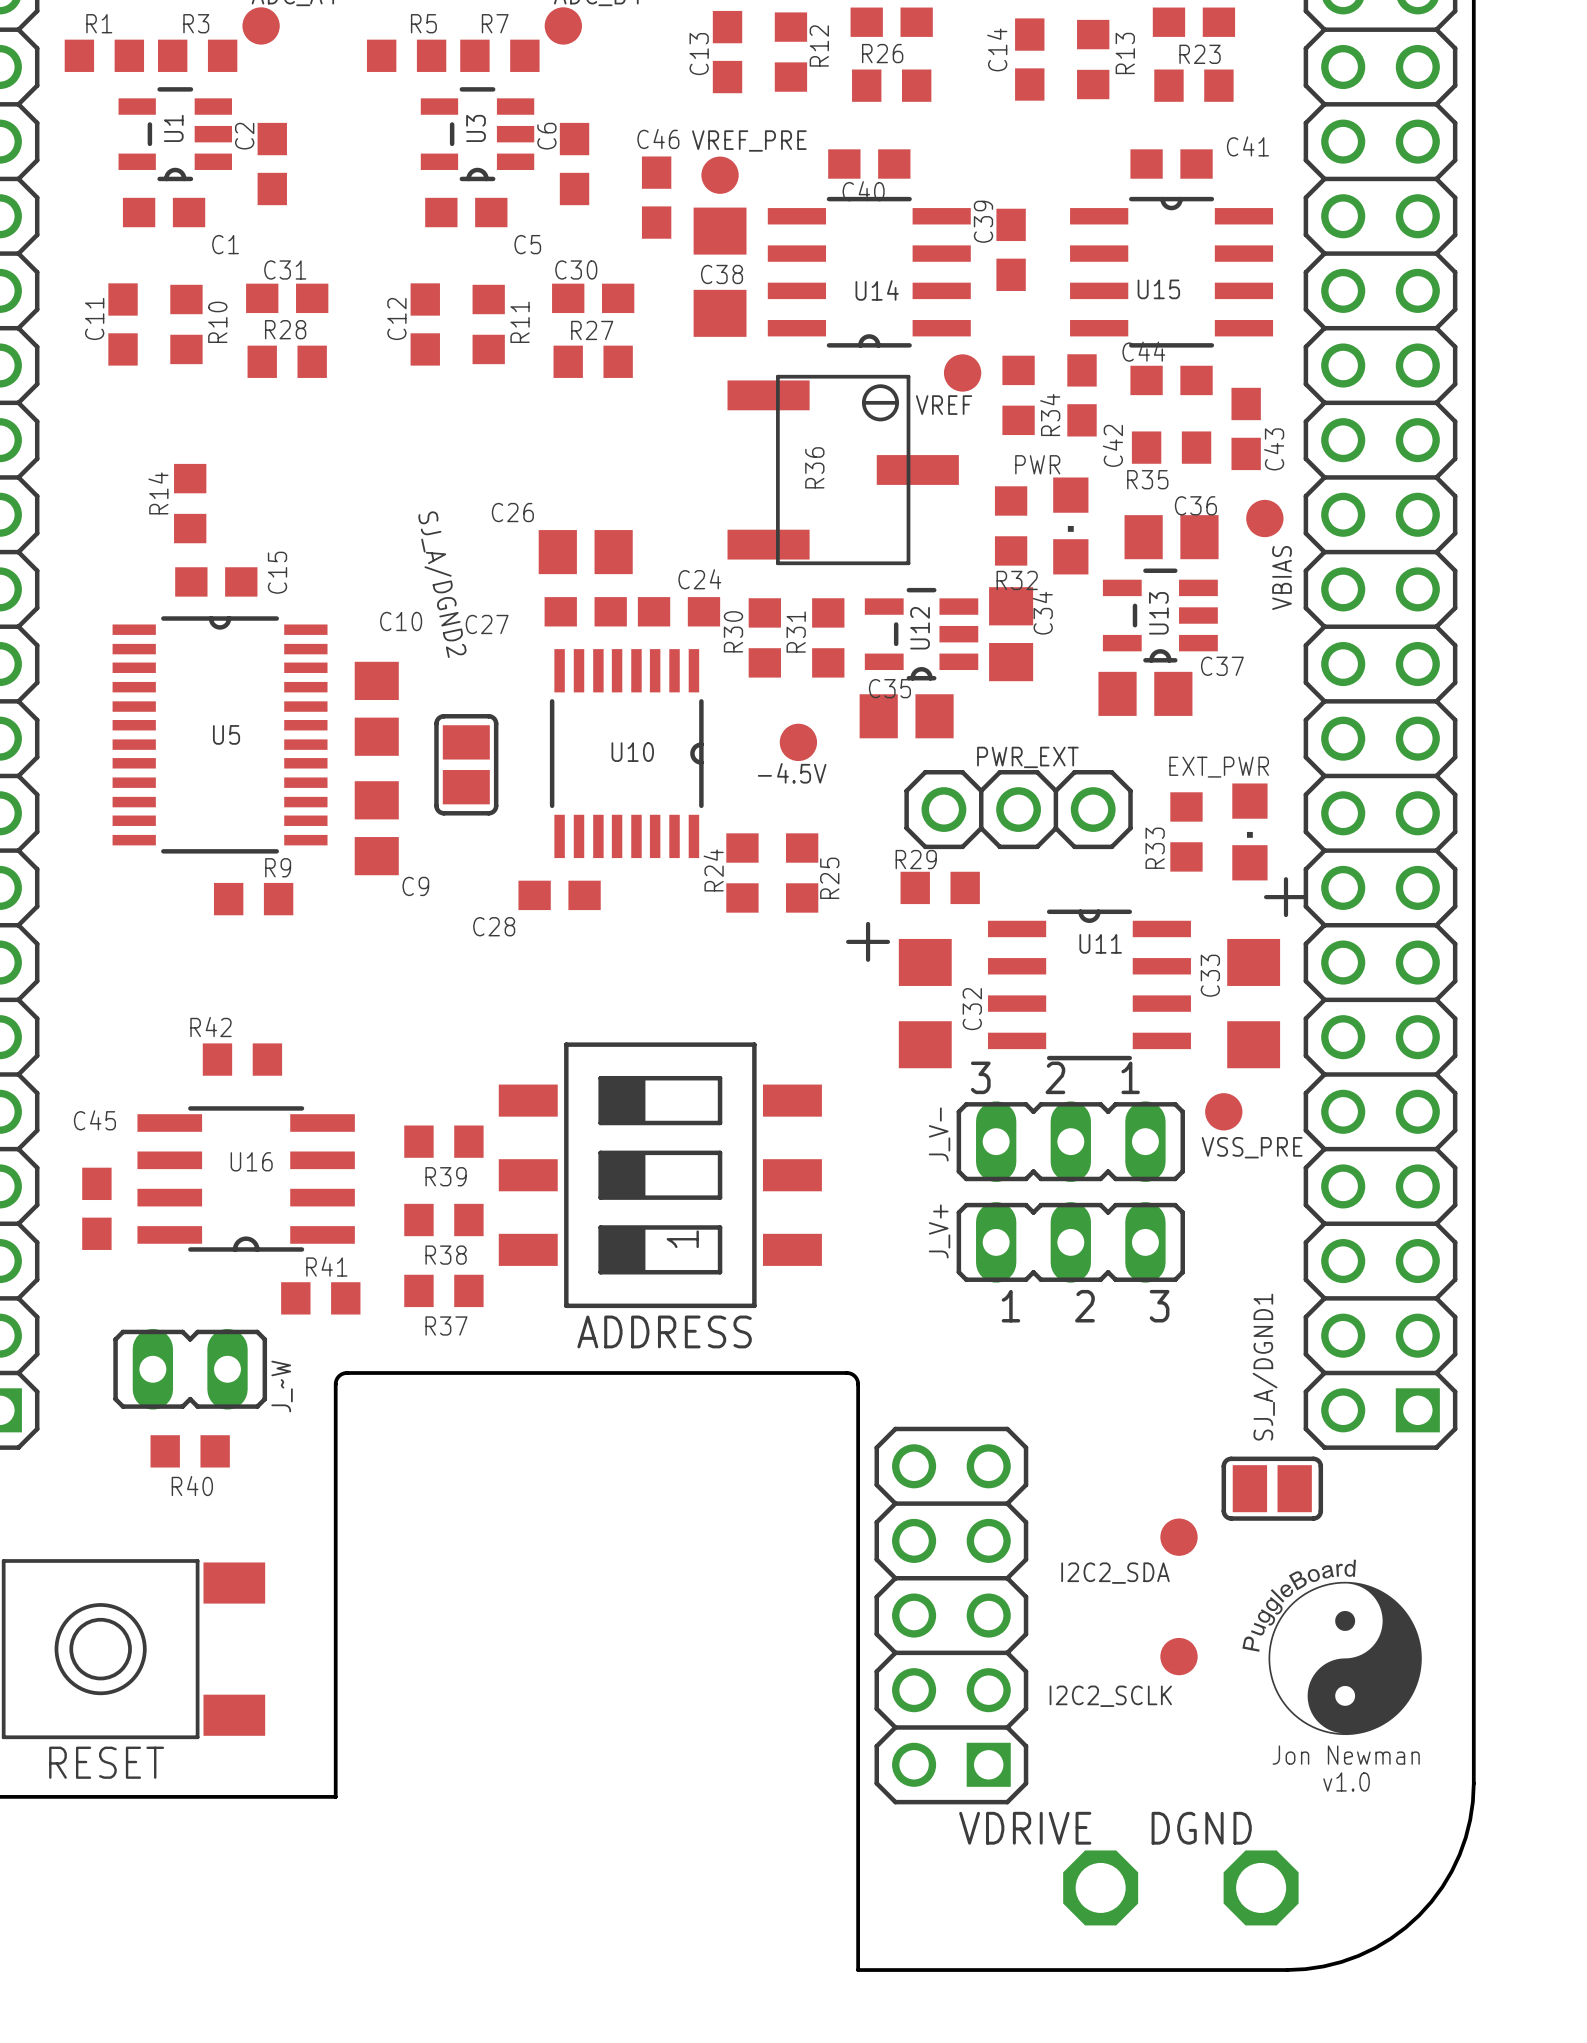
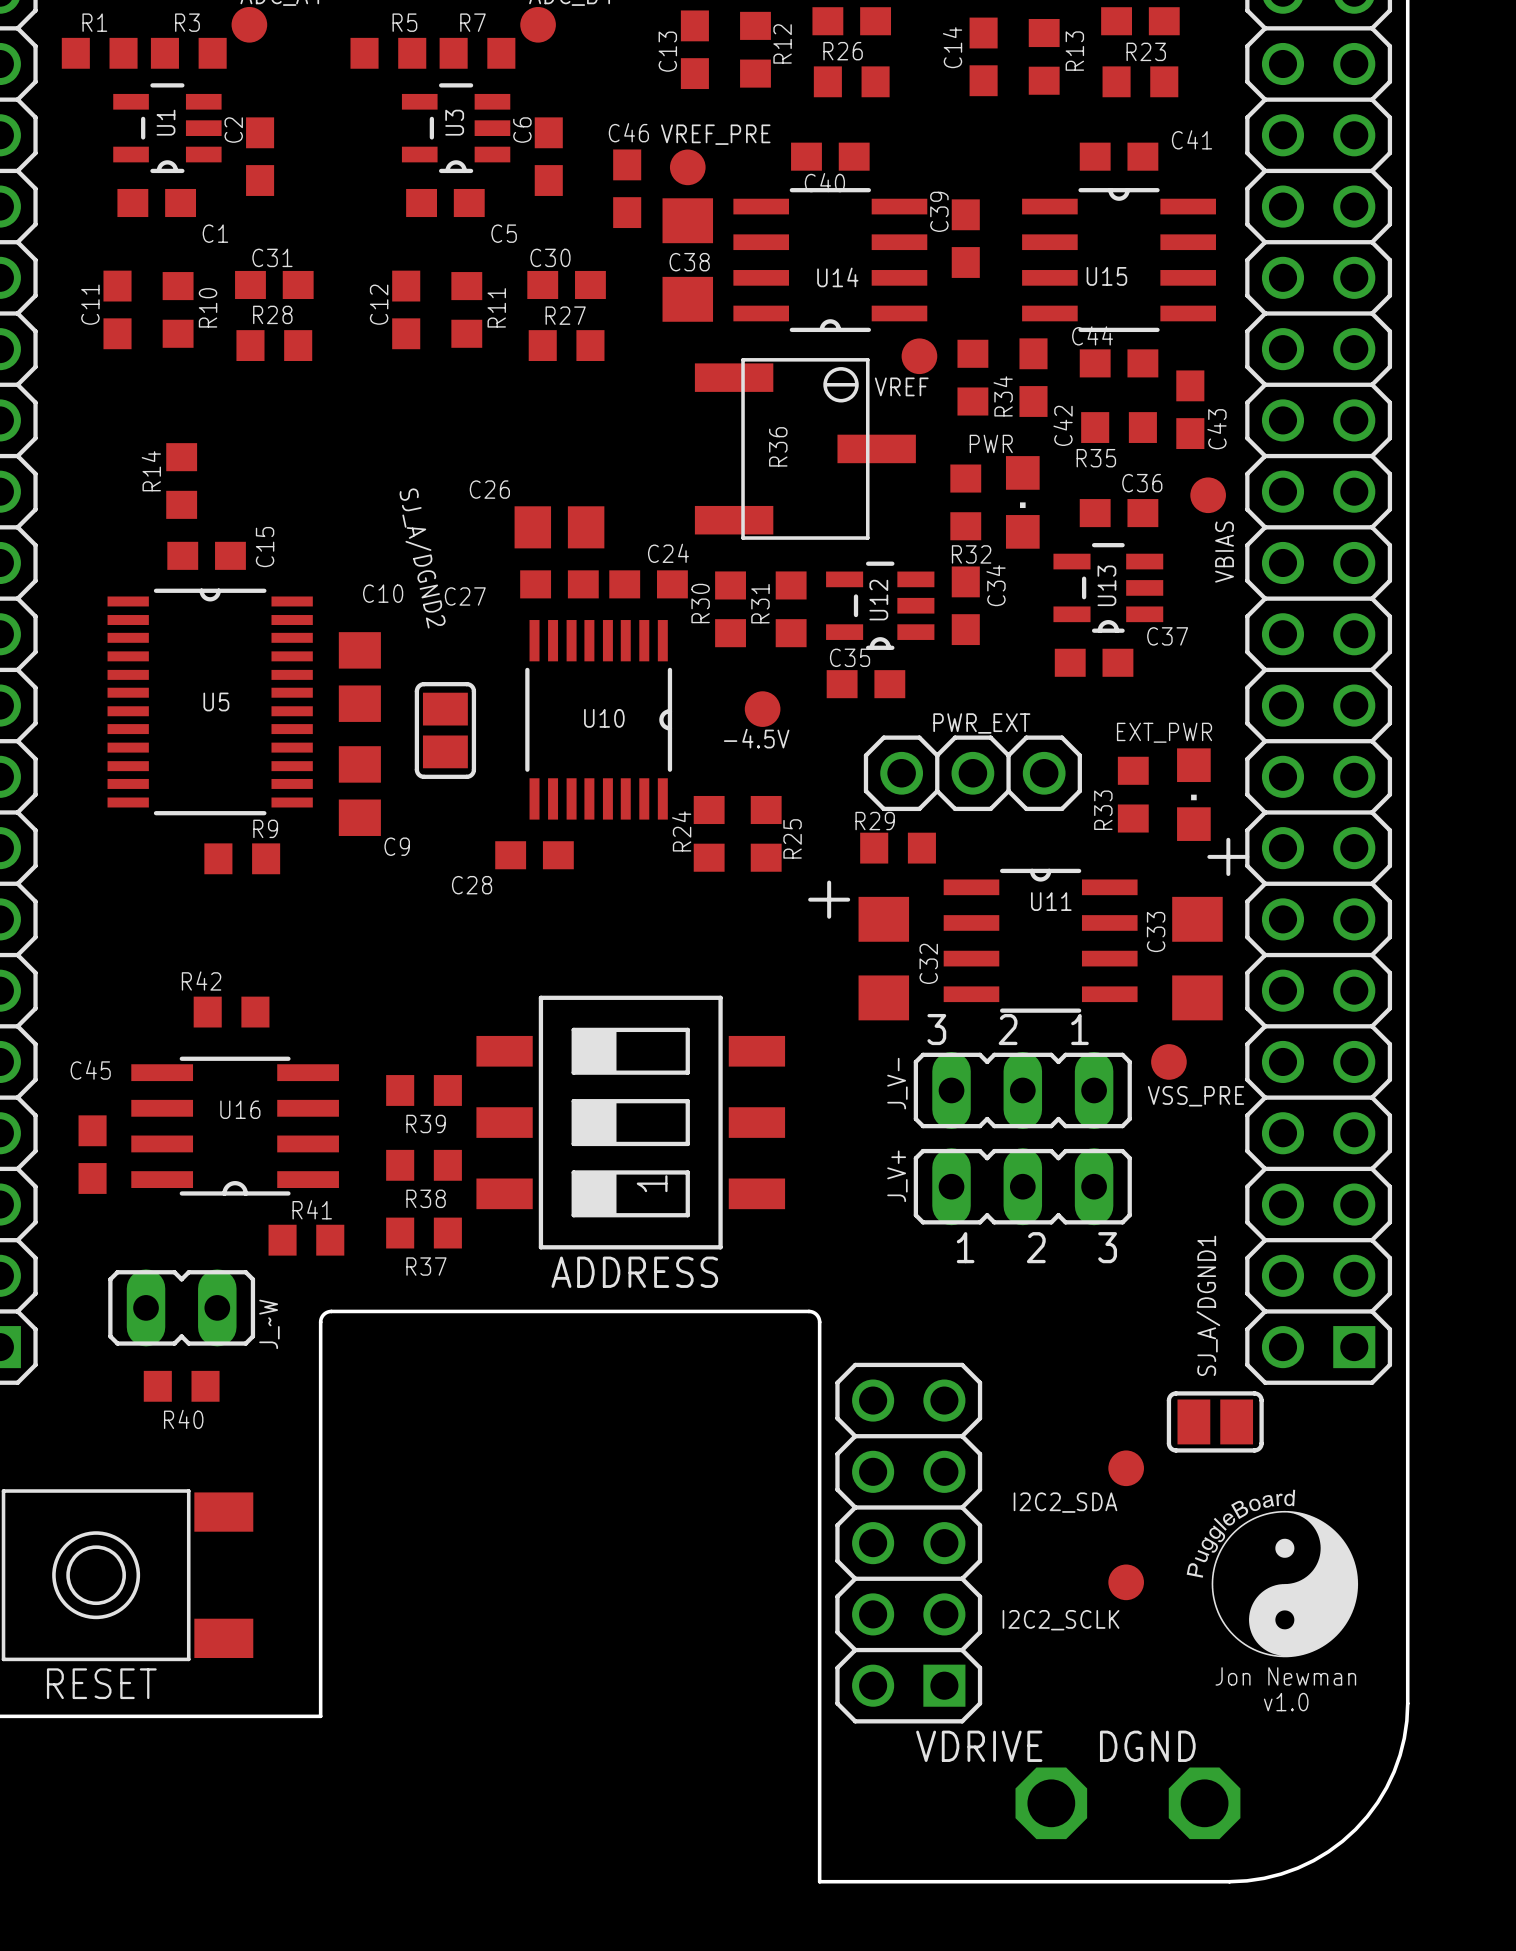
C36 footprint: [1124, 515, 1219, 560] -> [1079, 499, 1159, 528]
C34 footprint: [989, 587, 1034, 682] -> [951, 566, 980, 646]
C37 footprint: [1098, 671, 1193, 716] -> [1054, 648, 1134, 677]
C35 footprint: [859, 694, 954, 739] -> [826, 670, 906, 699]

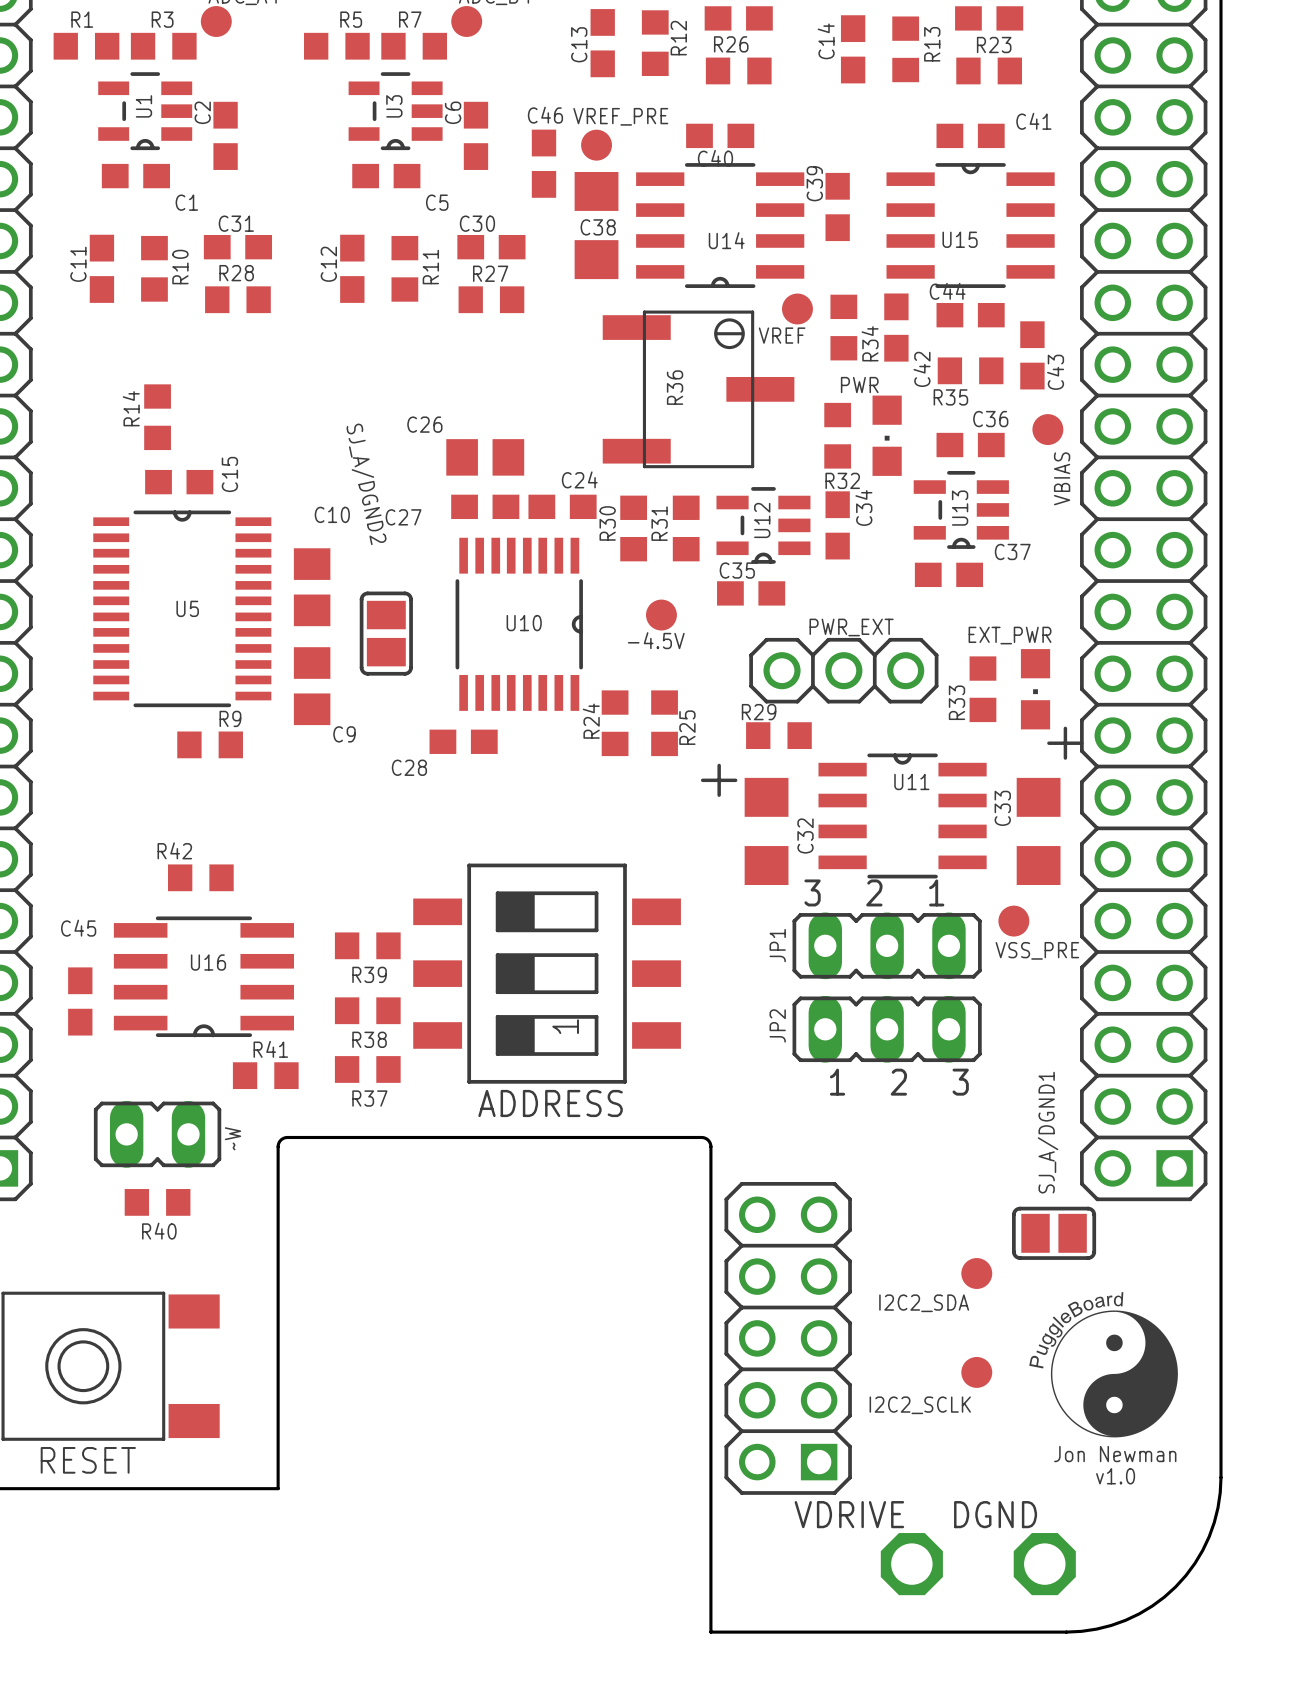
J_V- name: J_V- (897, 1083) -> JP1 (777, 945)
J_V+ name: J_V+ (897, 1176) -> JP2 (777, 1025)
J_~W name: J_~W (269, 1324) -> ~W (232, 1138)

